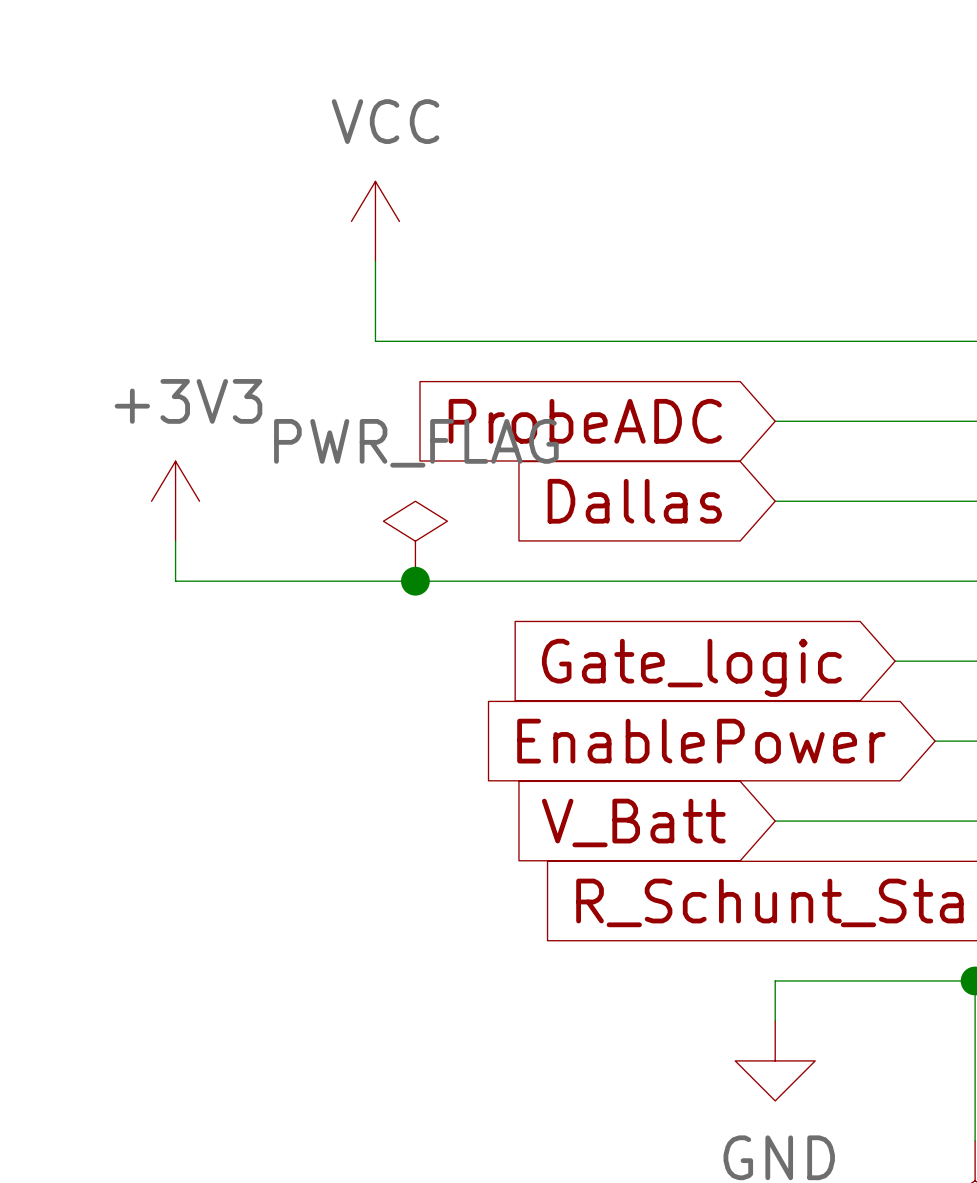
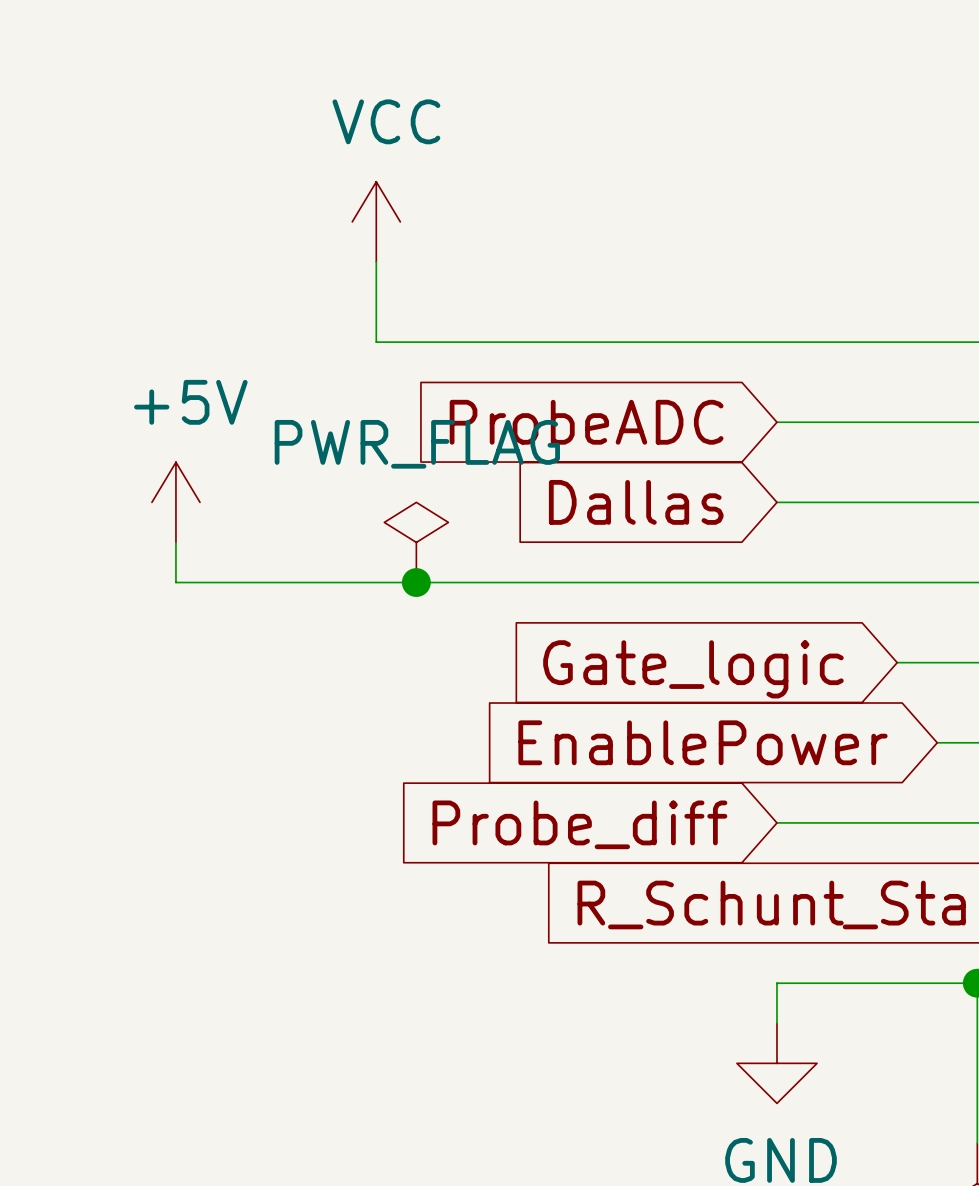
power symbol: +3V3 (175, 501) -> +5V (175, 502)
global label: V_Batt (633, 822) -> Probe_diff (579, 824)

